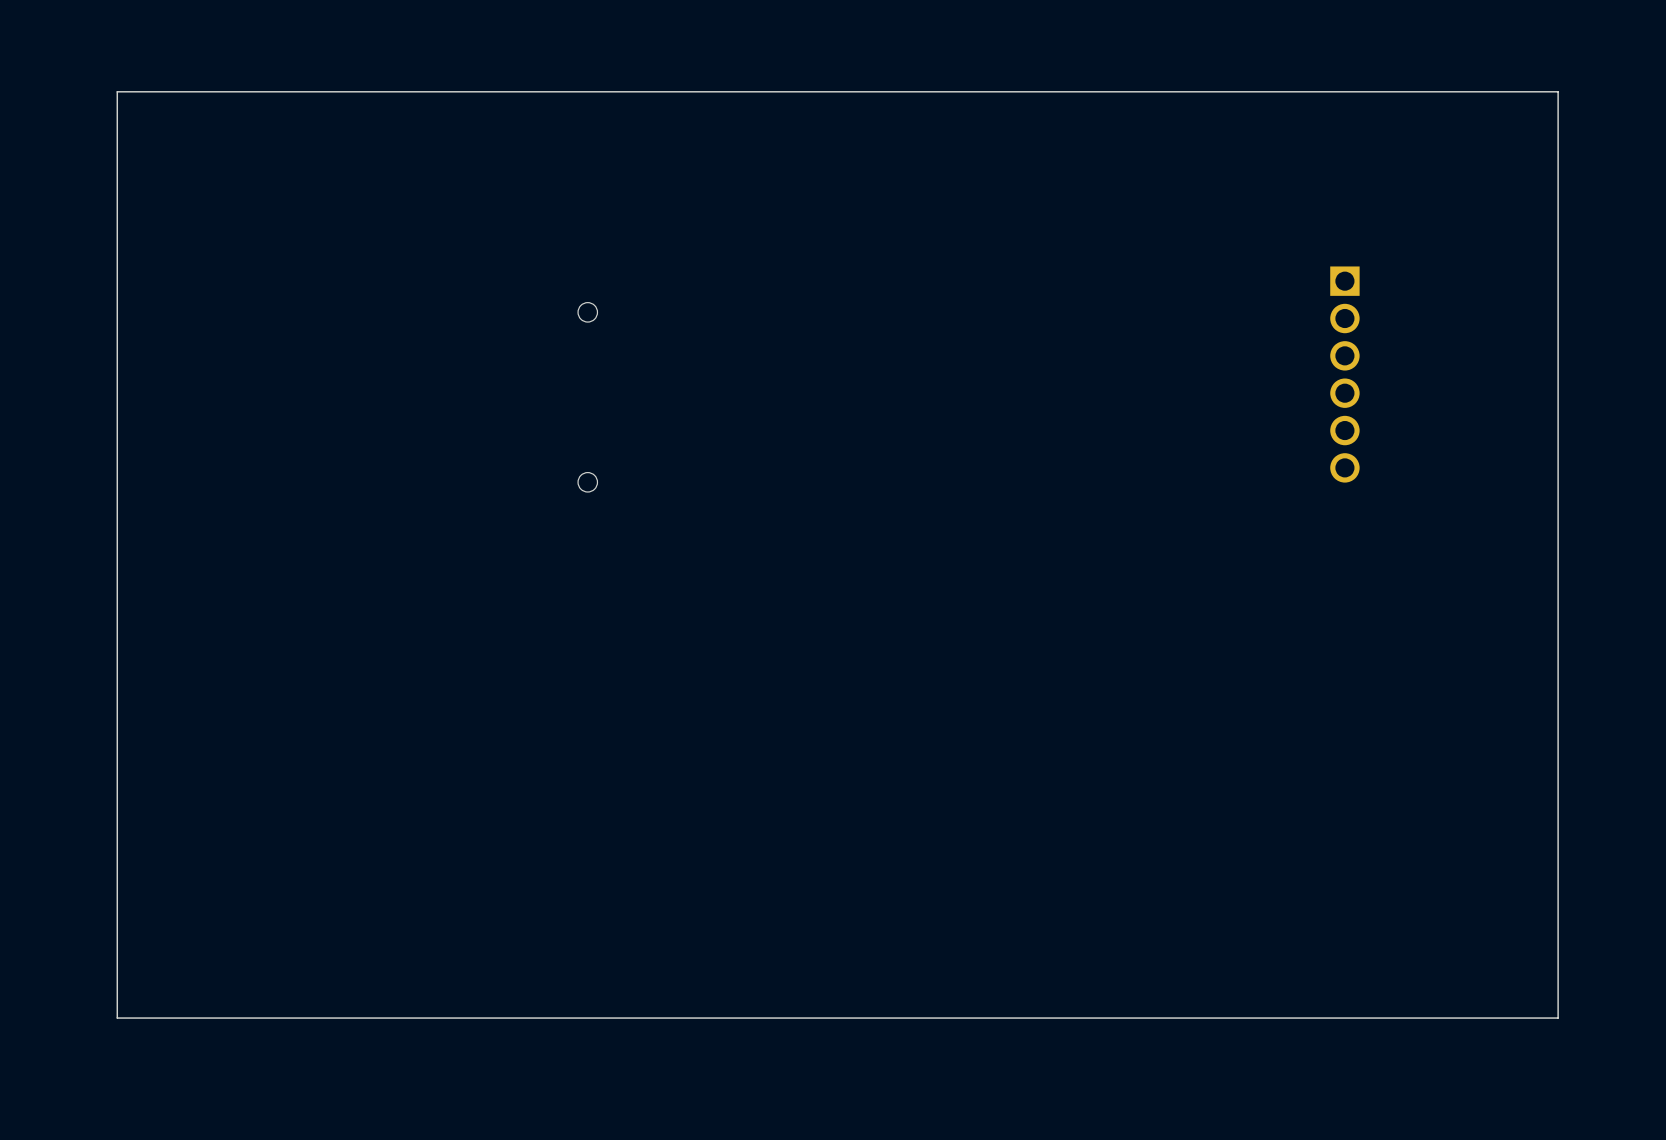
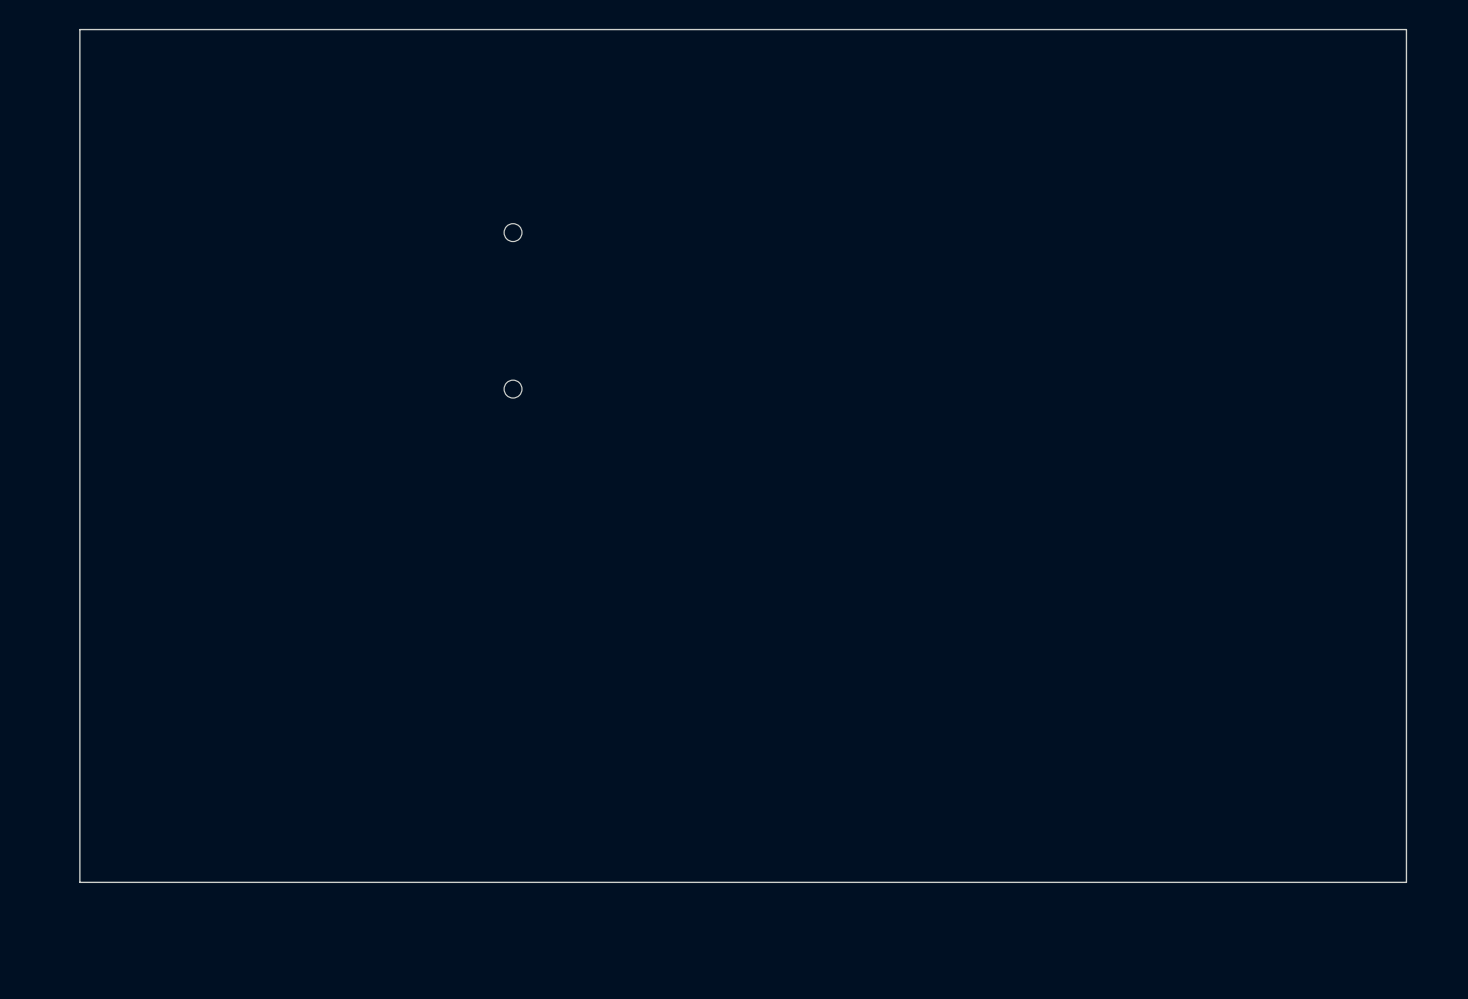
part: (1344, 374) -> none

